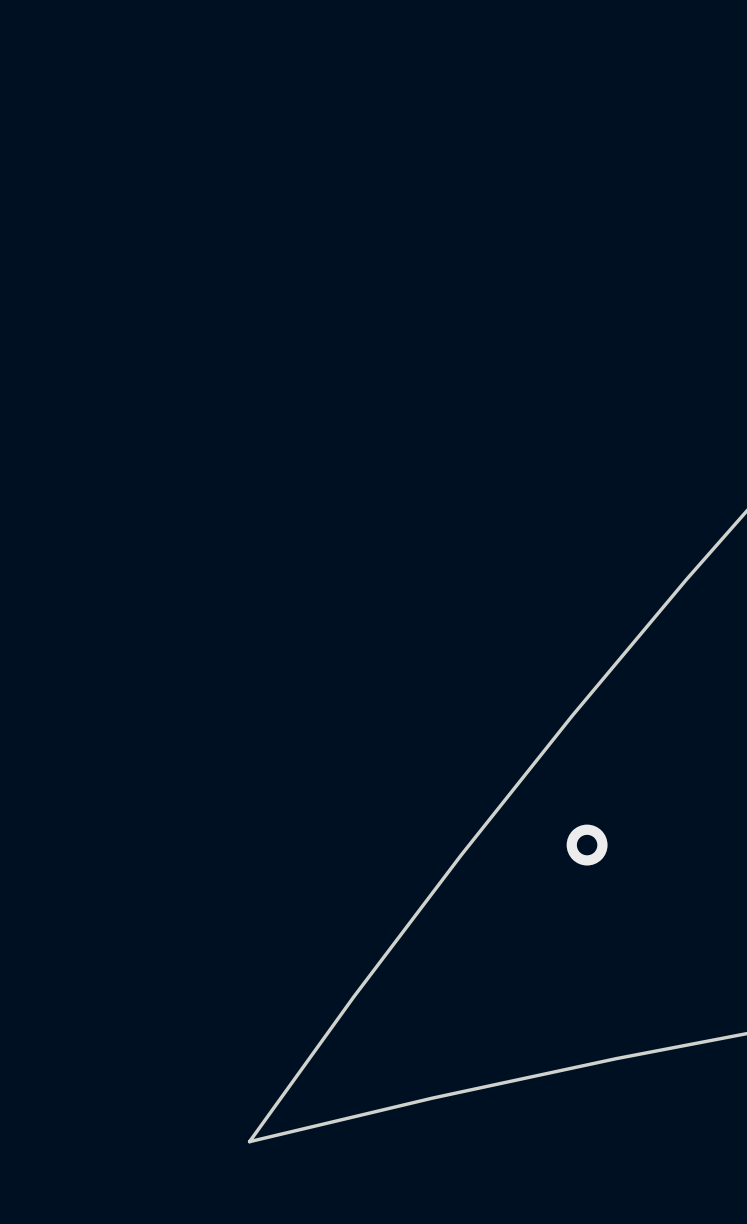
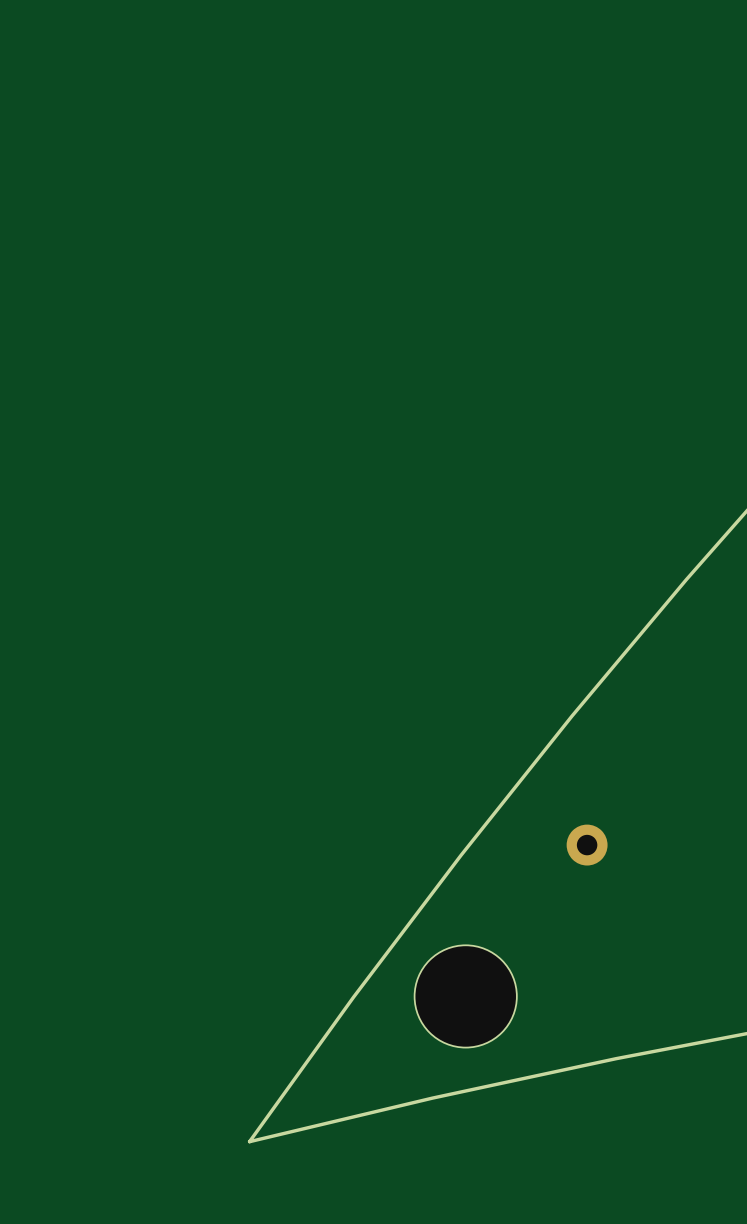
part: none -> (465, 996)

